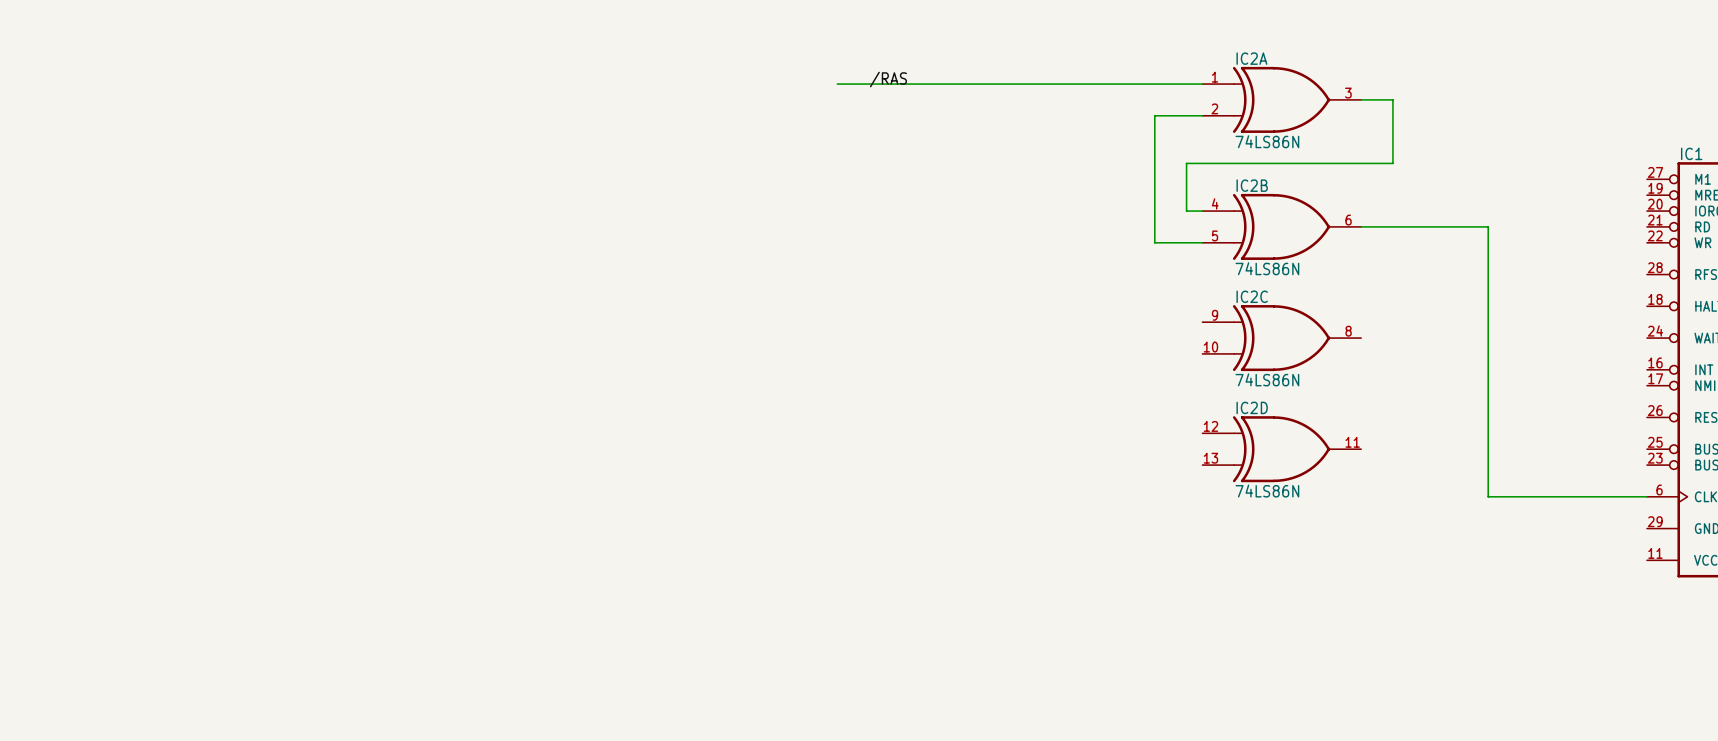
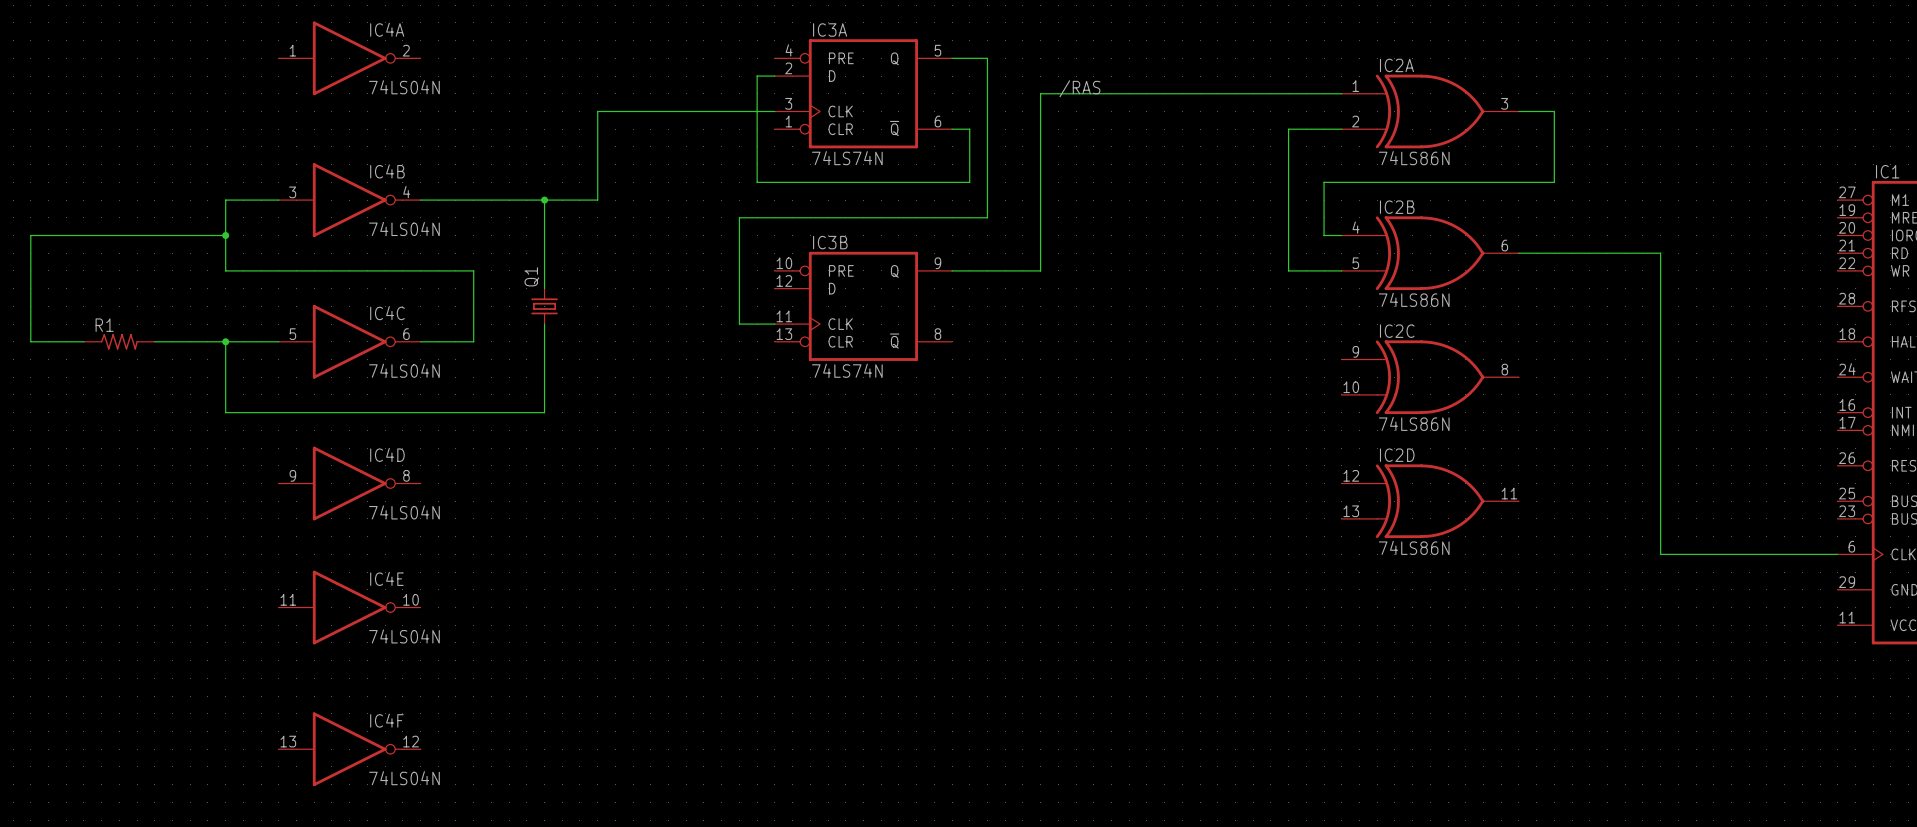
IC4A: none -> 74LS04N (349, 58)
wire: none -> (952, 58) (987, 58) (987, 217) (739, 217) (739, 324) (774, 324)
wire: none -> (774, 76) (757, 76) (757, 182) (969, 182) (969, 129) (952, 129)
label position: /RAS (888, 79) -> /RAS (1079, 88)
IC3A: none -> 74LS74N (863, 93)
wire: (837, 84) (932, 84) -> (952, 270) (1040, 270) (1040, 93)
wire: none -> (774, 111) (597, 111) (597, 200) (420, 200)
wire: none -> (278, 200) (225, 200) (225, 270) (473, 270) (473, 341) (420, 341)
IC4B: none -> 74LS04N (349, 200)
wire: none -> (544, 200) (544, 288)
junction: none -> (544, 200)
wire: none -> (225, 235) (30, 235) (30, 341) (83, 341)
junction: none -> (225, 235)
Q1: none -> (544, 306)
IC3B: none -> 74LS74N (863, 306)
wire: none -> (544, 324) (544, 412) (225, 412) (225, 341)
R1: none -> (119, 341)
wire: none -> (154, 341) (278, 341)
junction: none -> (225, 341)
IC4C: none -> 74LS04N (349, 341)
IC4D: none -> 74LS04N (349, 483)
IC4E: none -> 74LS04N (349, 607)
IC4F: none -> 74LS04N (349, 749)

